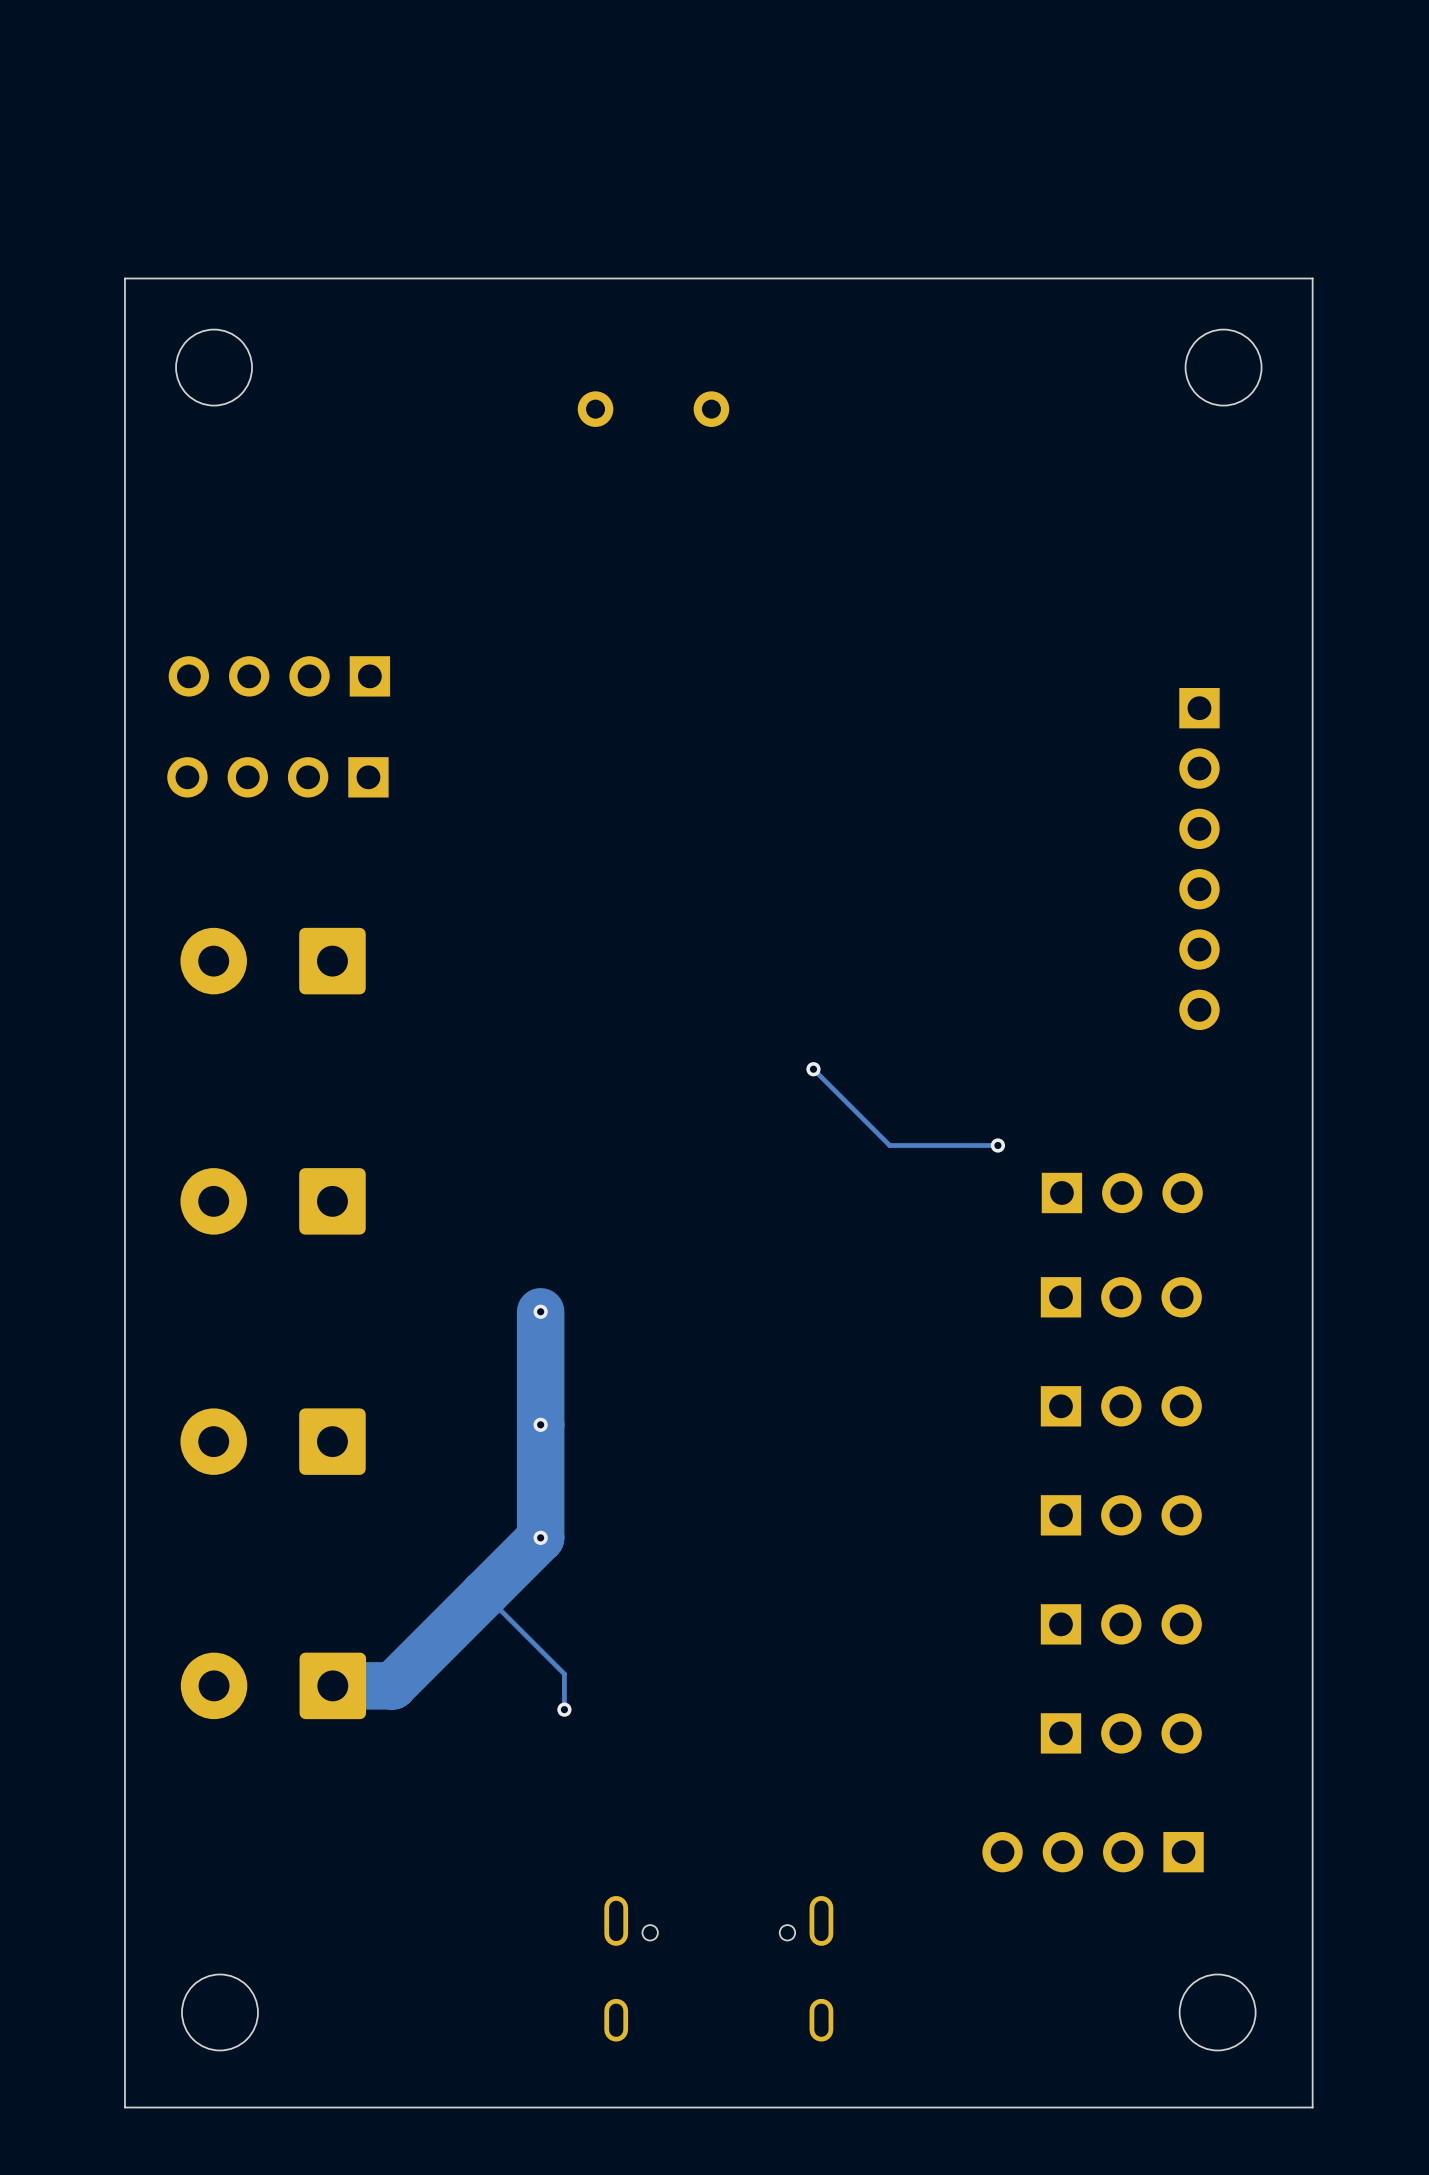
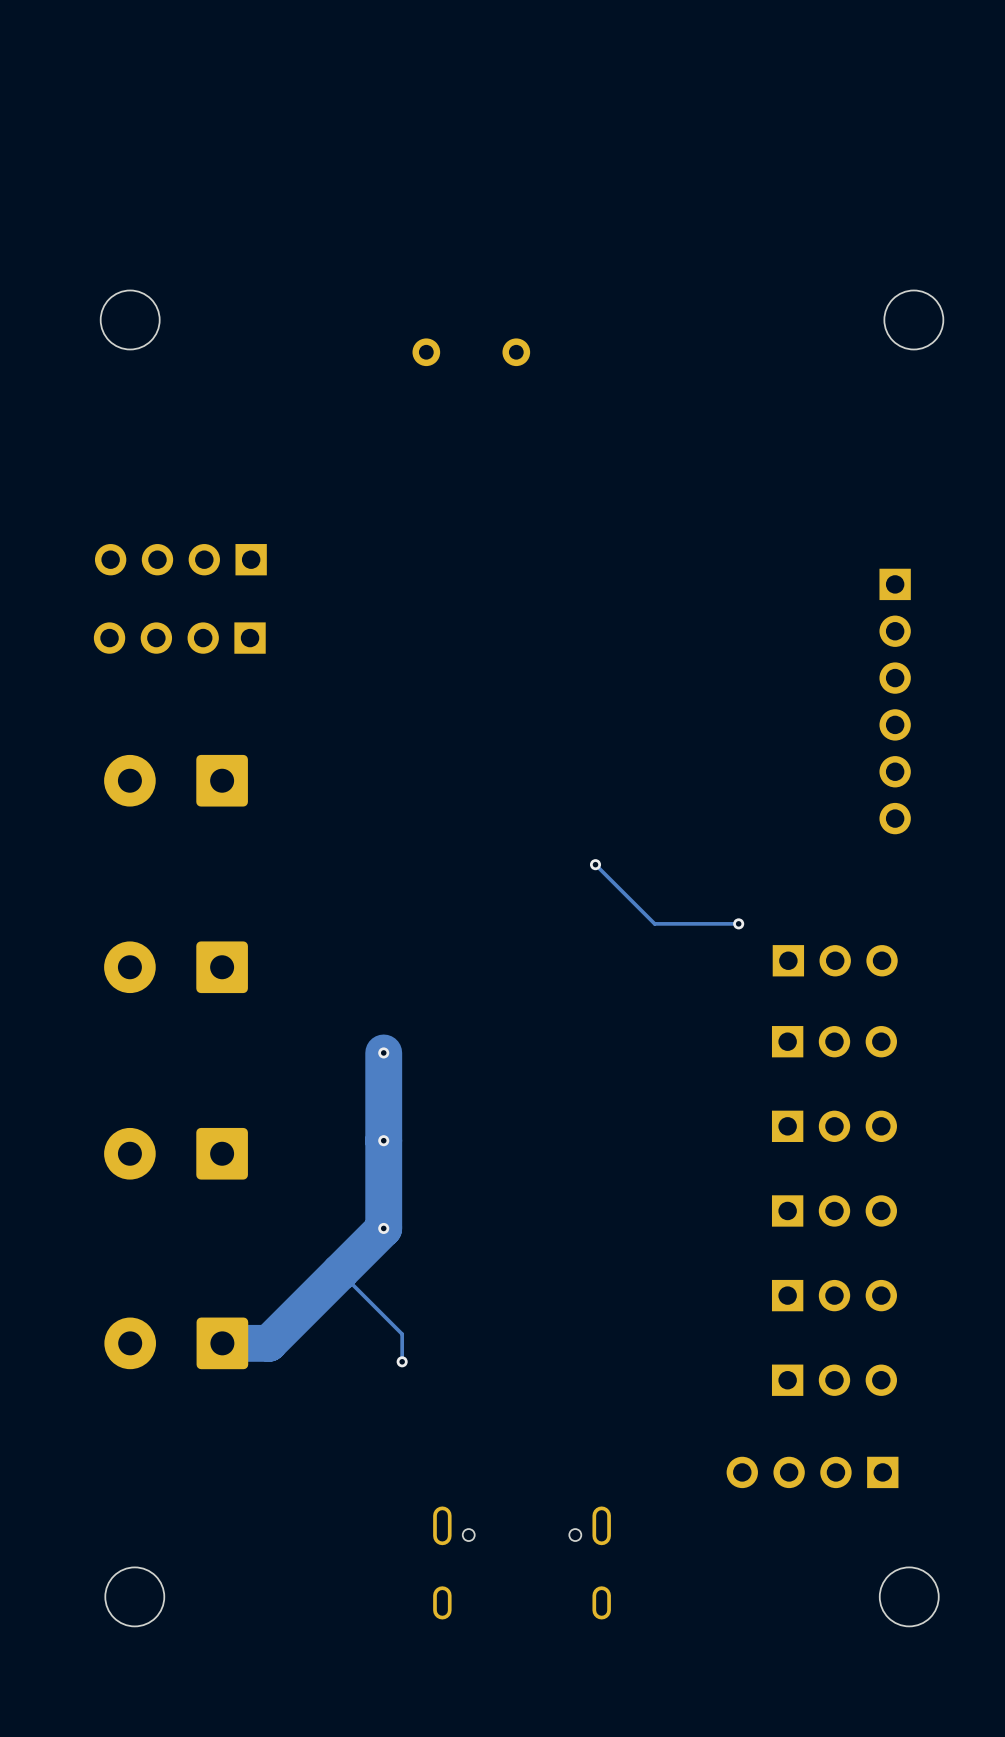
board edge: (1312, 278) (124, 278) (124, 2107) (1312, 2107) (1312, 278) -> none

